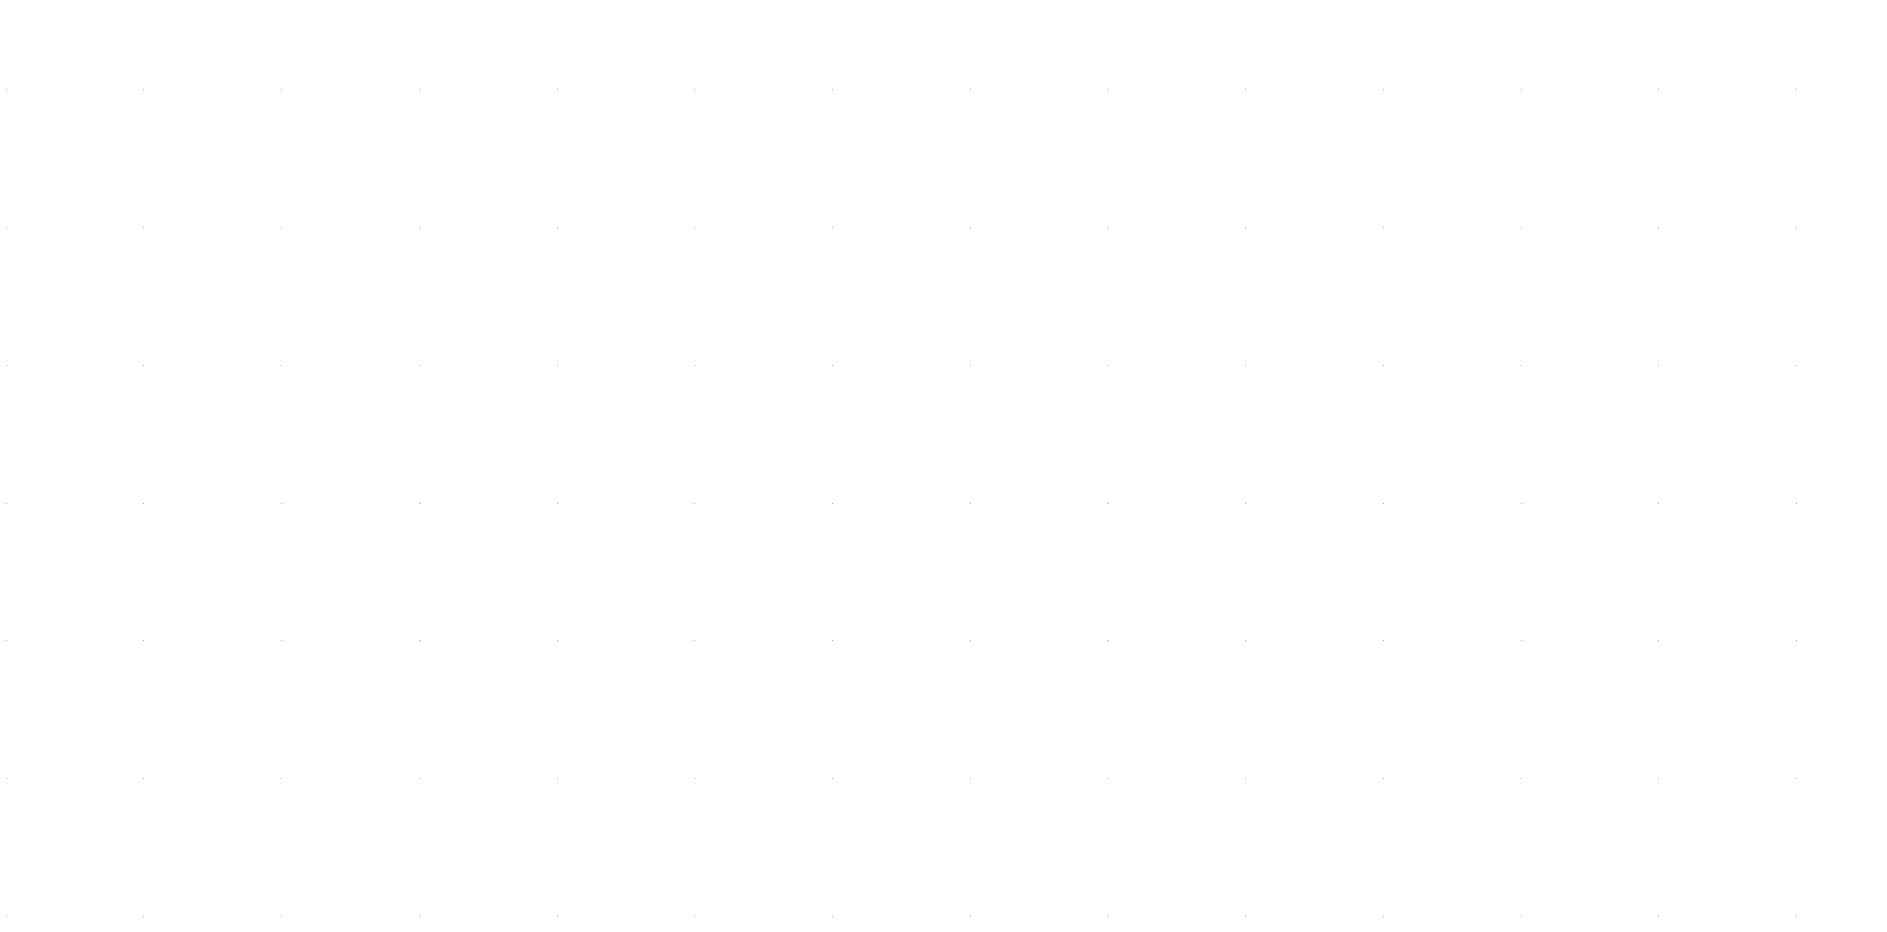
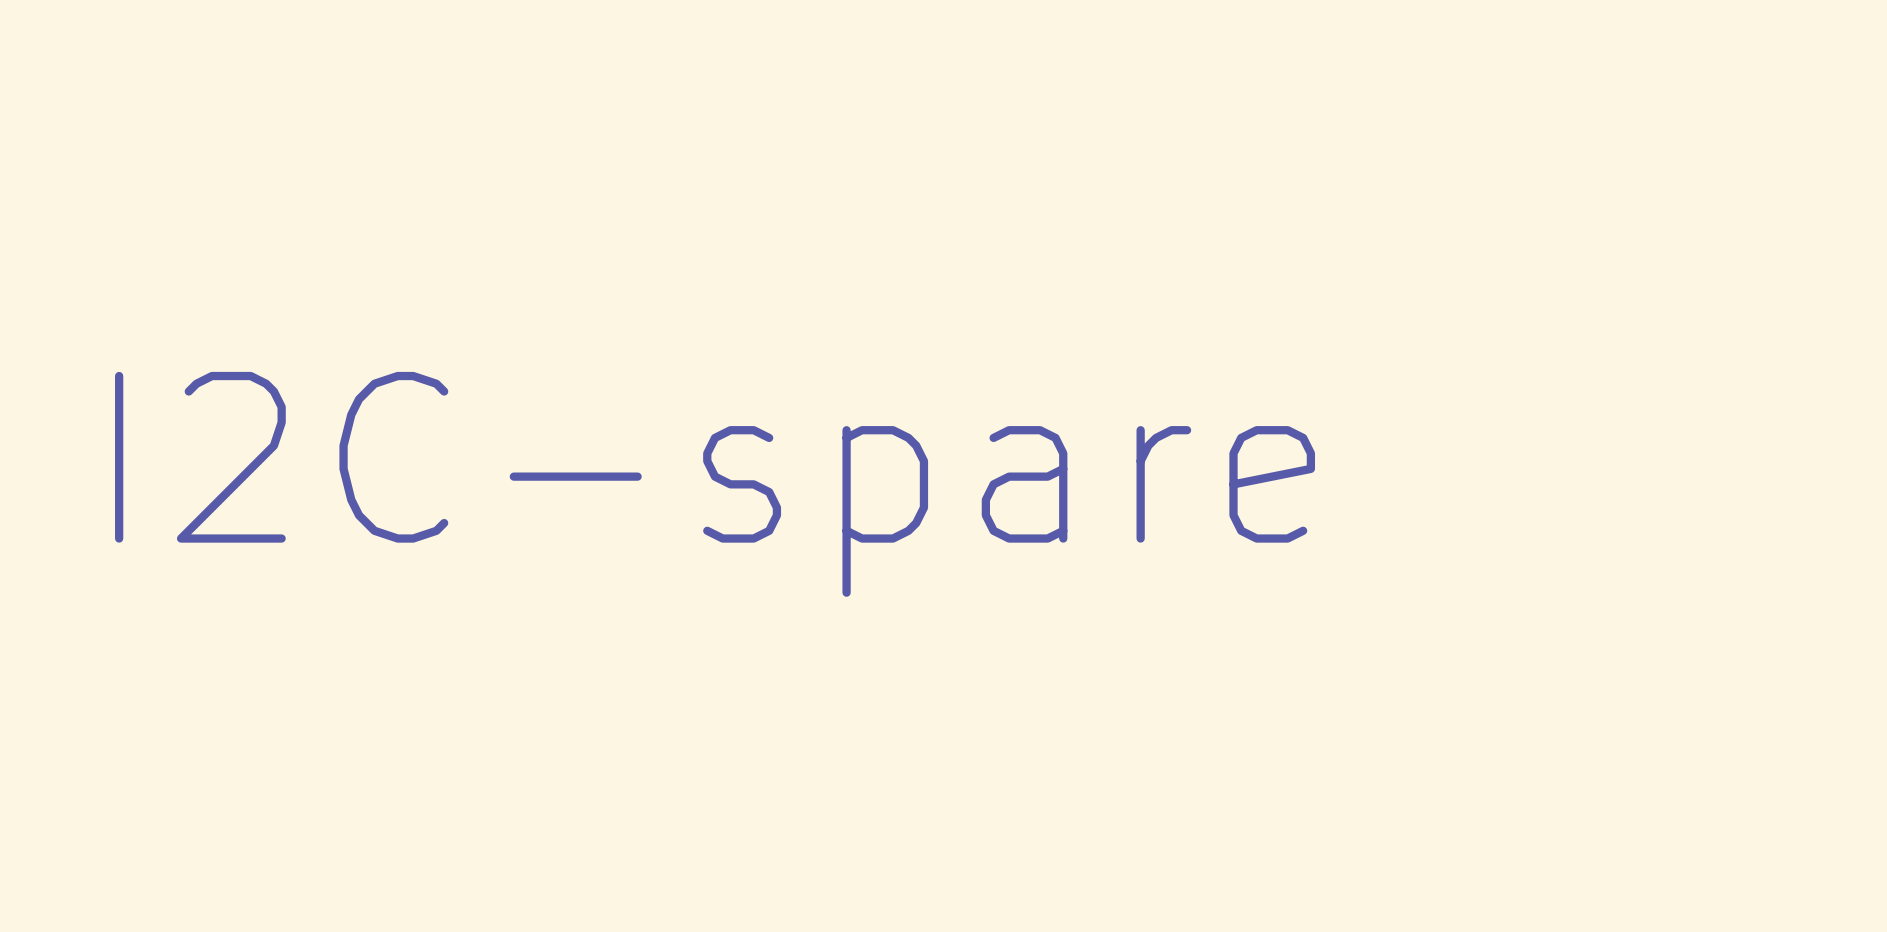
text: none -> I2C-spare (715, 484)

